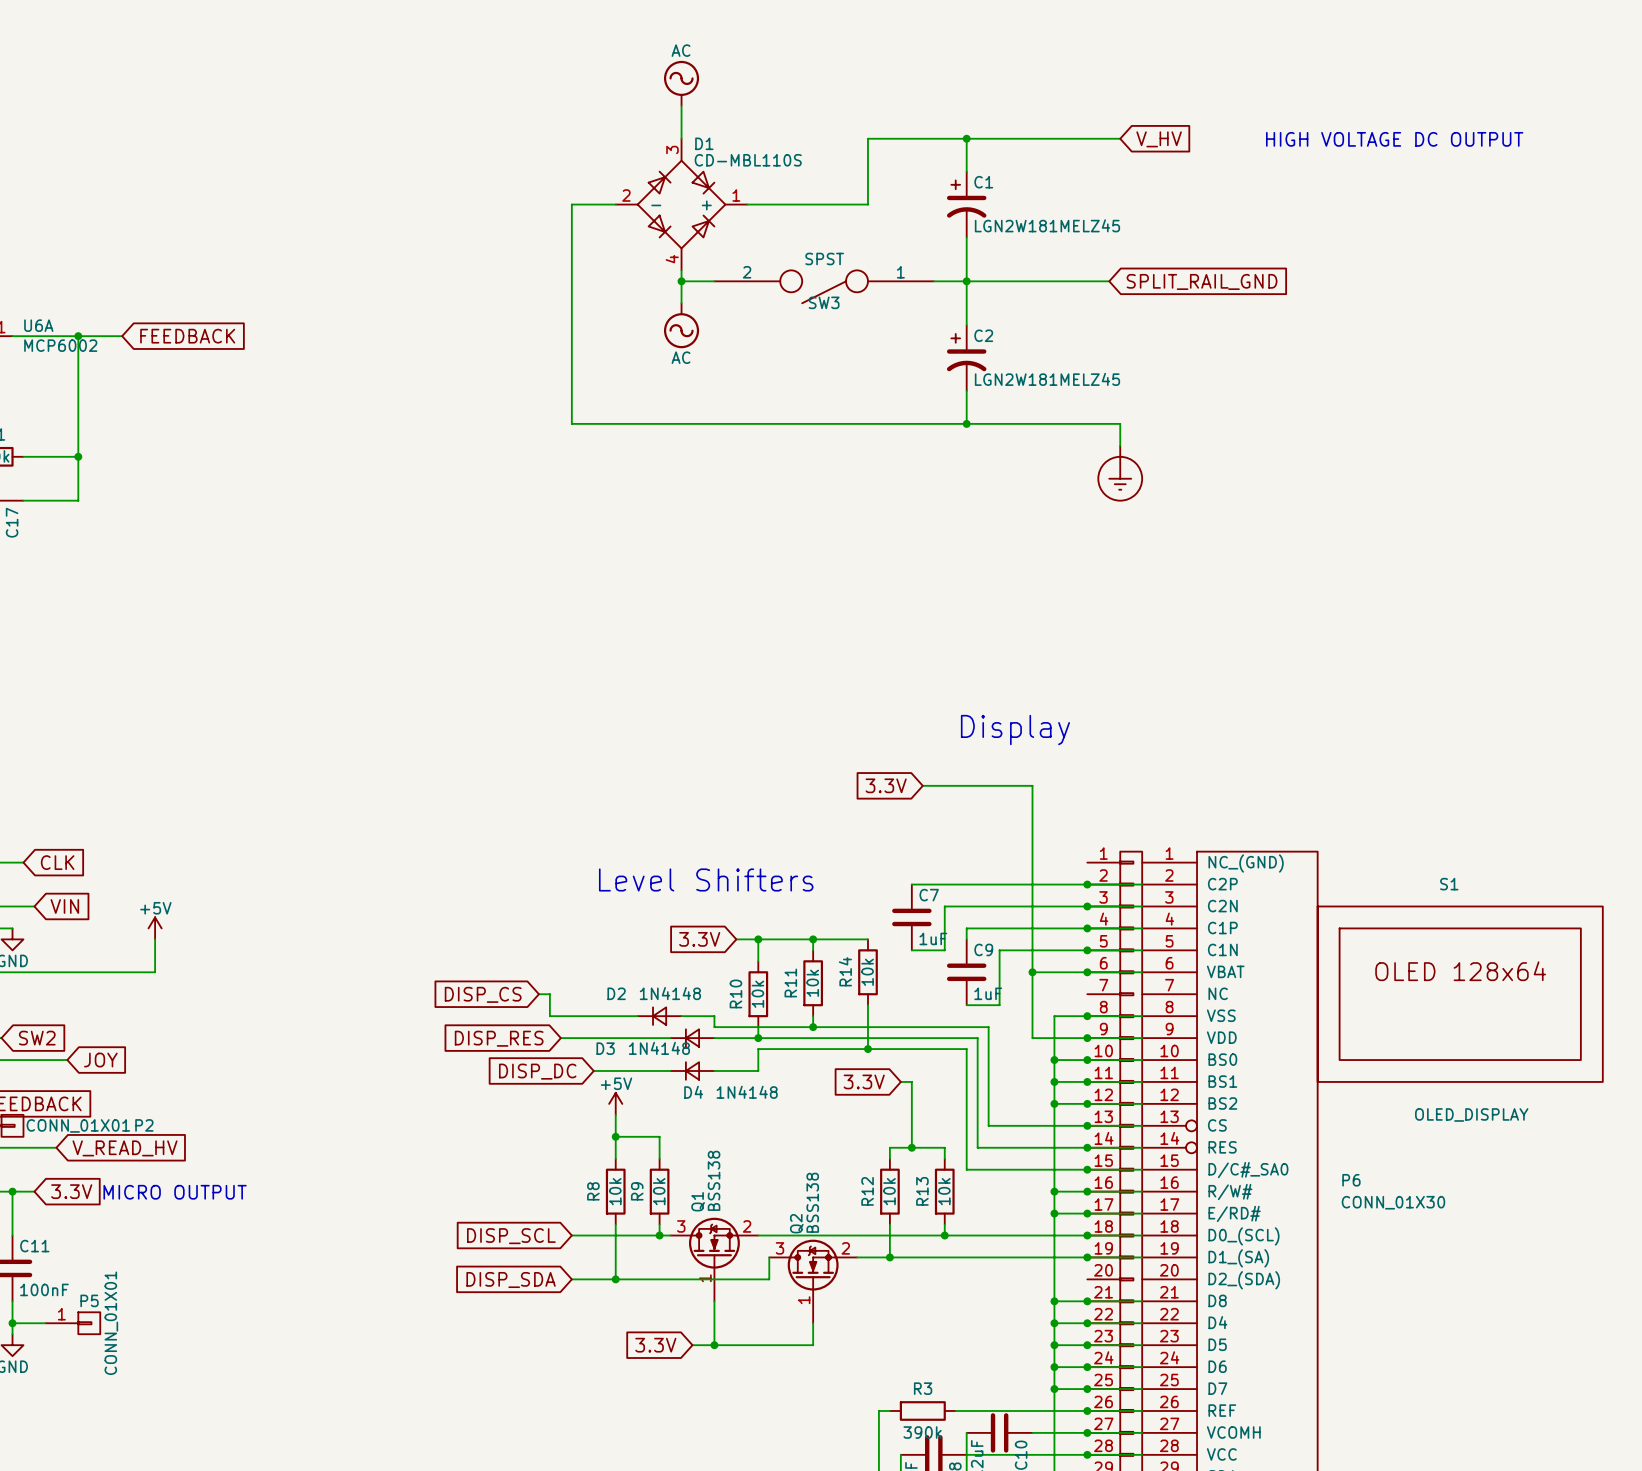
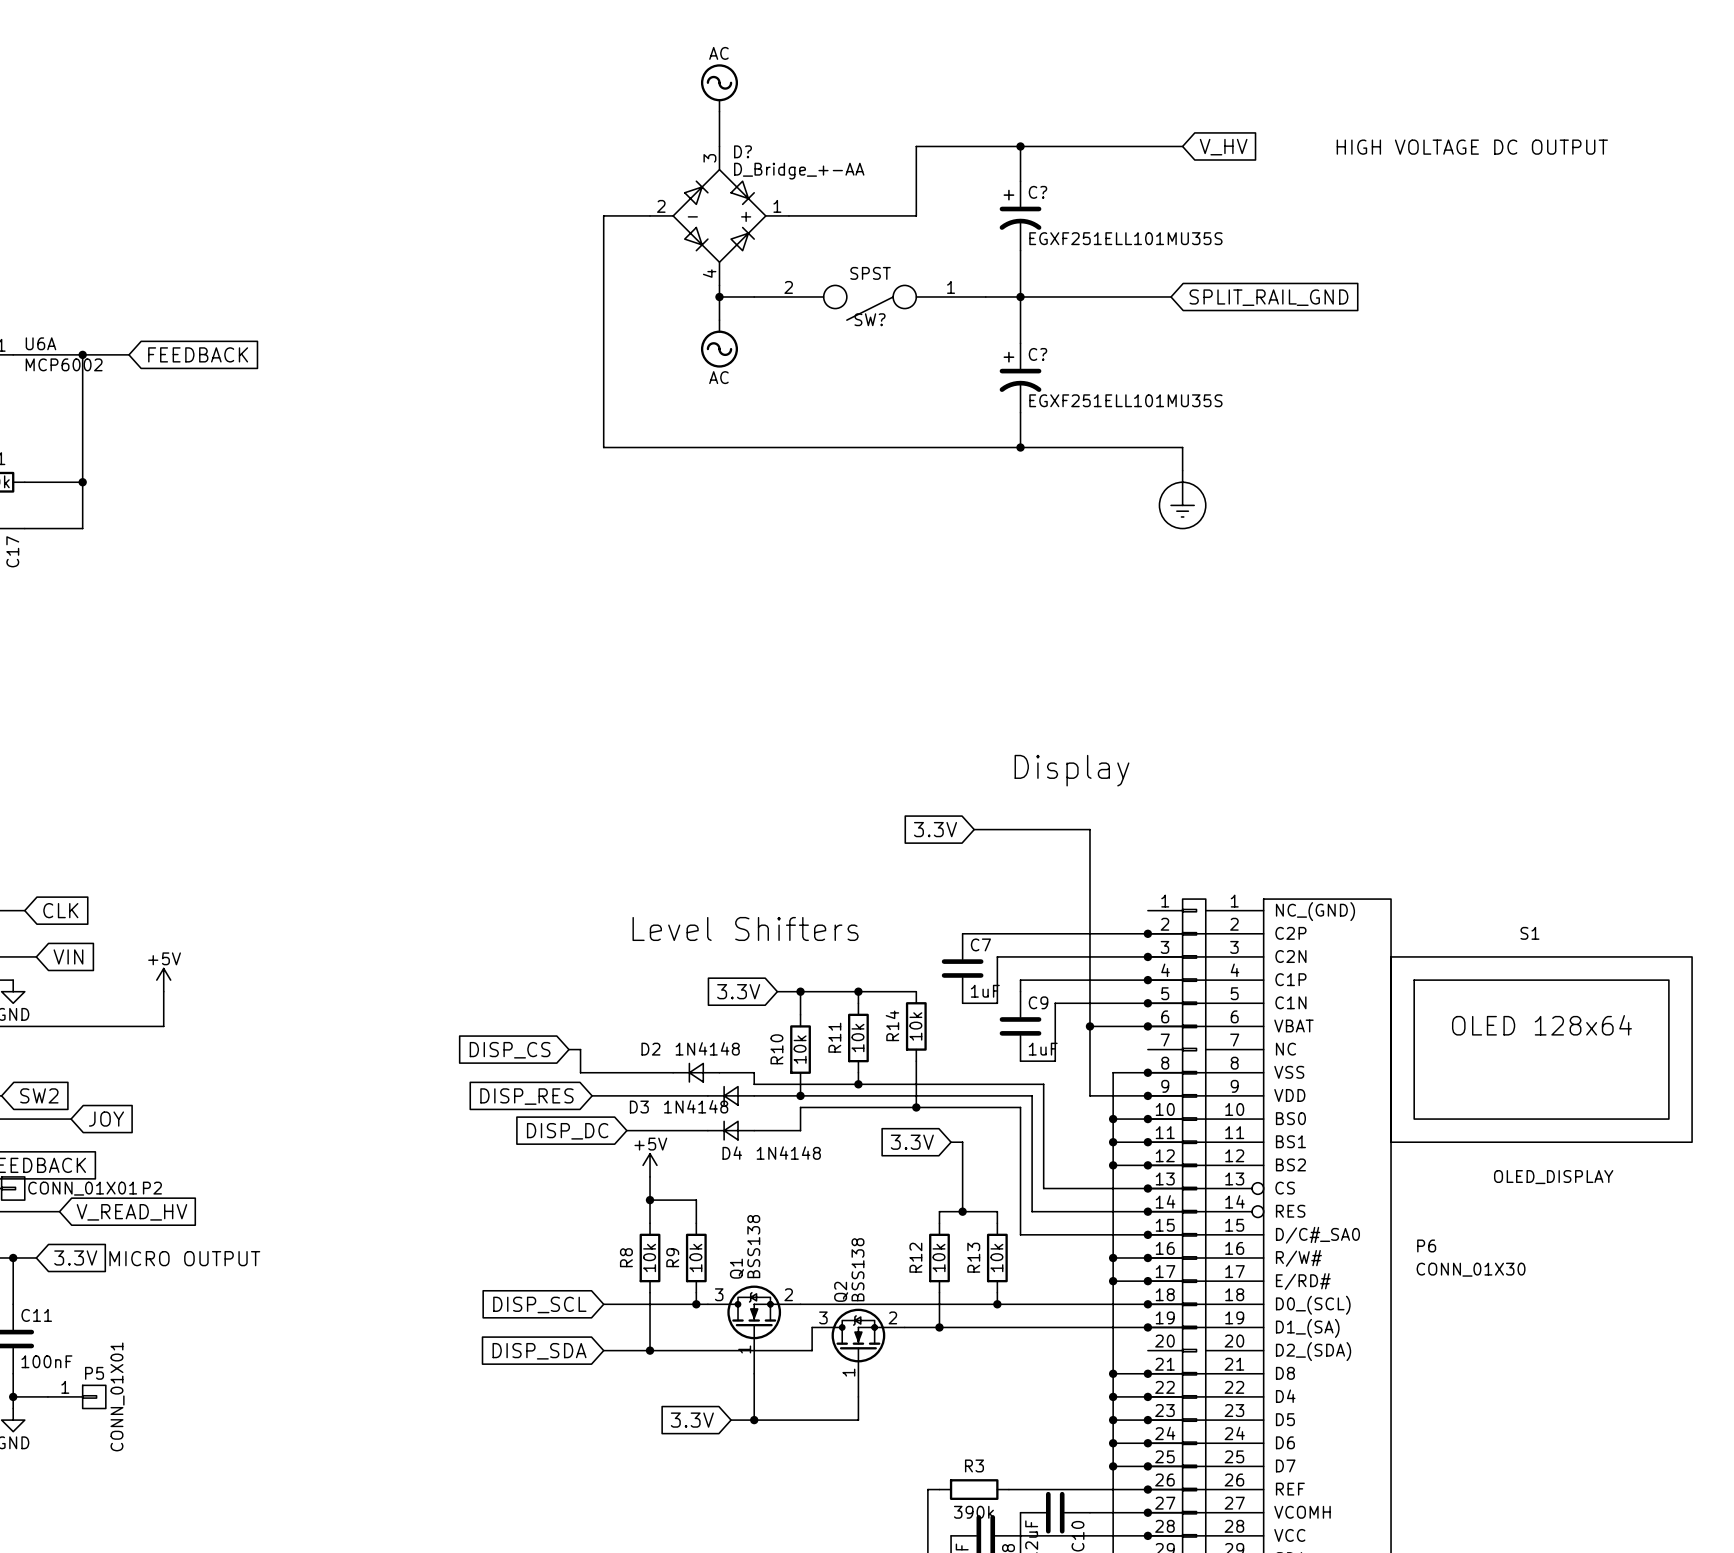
D1 name: D1 (704, 143) -> D? (743, 151)
D1 value: CD-MBL110S (748, 160) -> D_Bridge_+-AA (799, 171)
C1 name: C1 (983, 182) -> C? (1037, 192)
C1 value: LGN2W181MELZ45 (1047, 225) -> EGXF251ELL101MU35S (1125, 238)
SW3 name: SW3 (824, 302) -> SW? (870, 319)
C2 name: C2 (983, 335) -> C? (1037, 354)
C2 value: LGN2W181MELZ45 (1047, 379) -> EGXF251ELL101MU35S (1125, 400)

